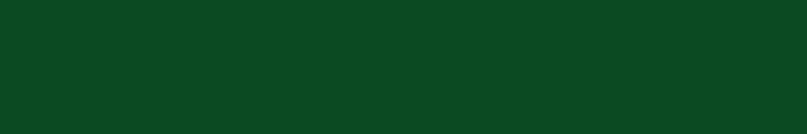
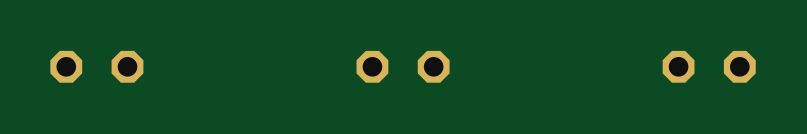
part: none -> (96, 66)
part: none -> (403, 66)
part: none -> (709, 66)

